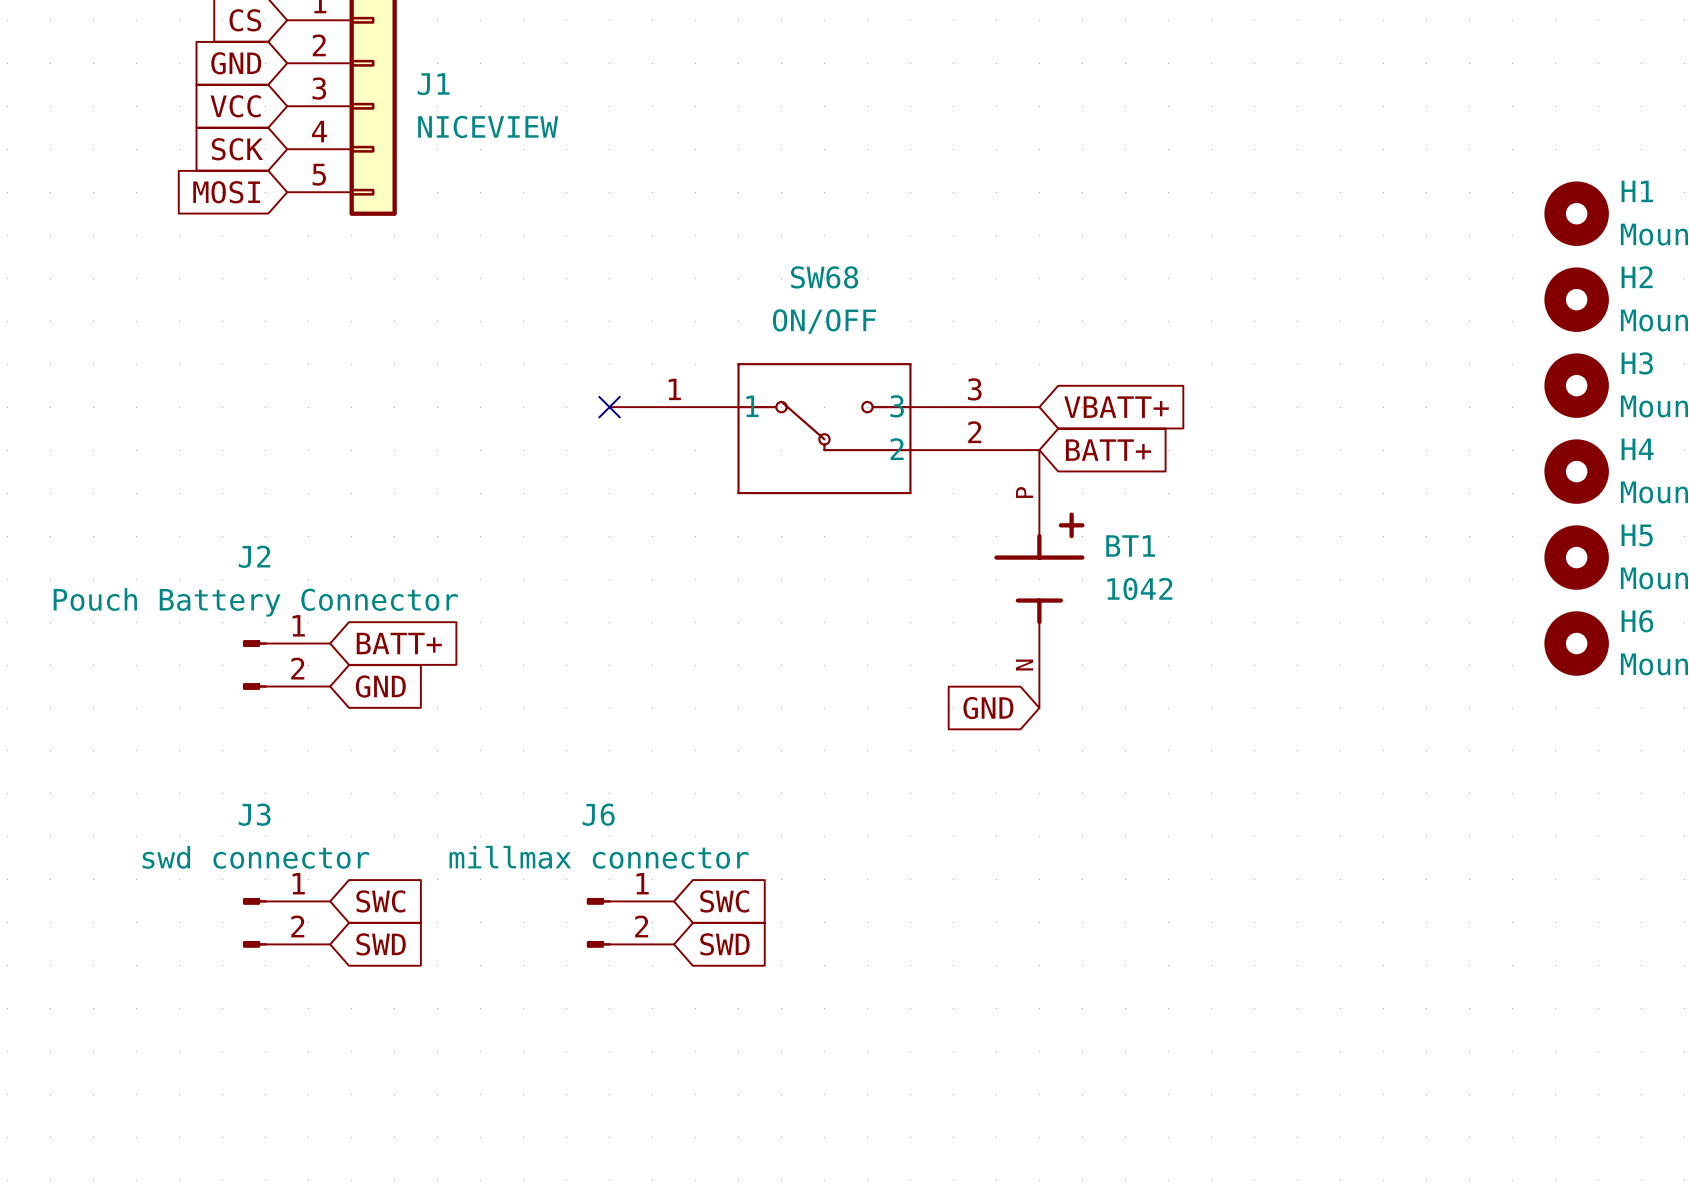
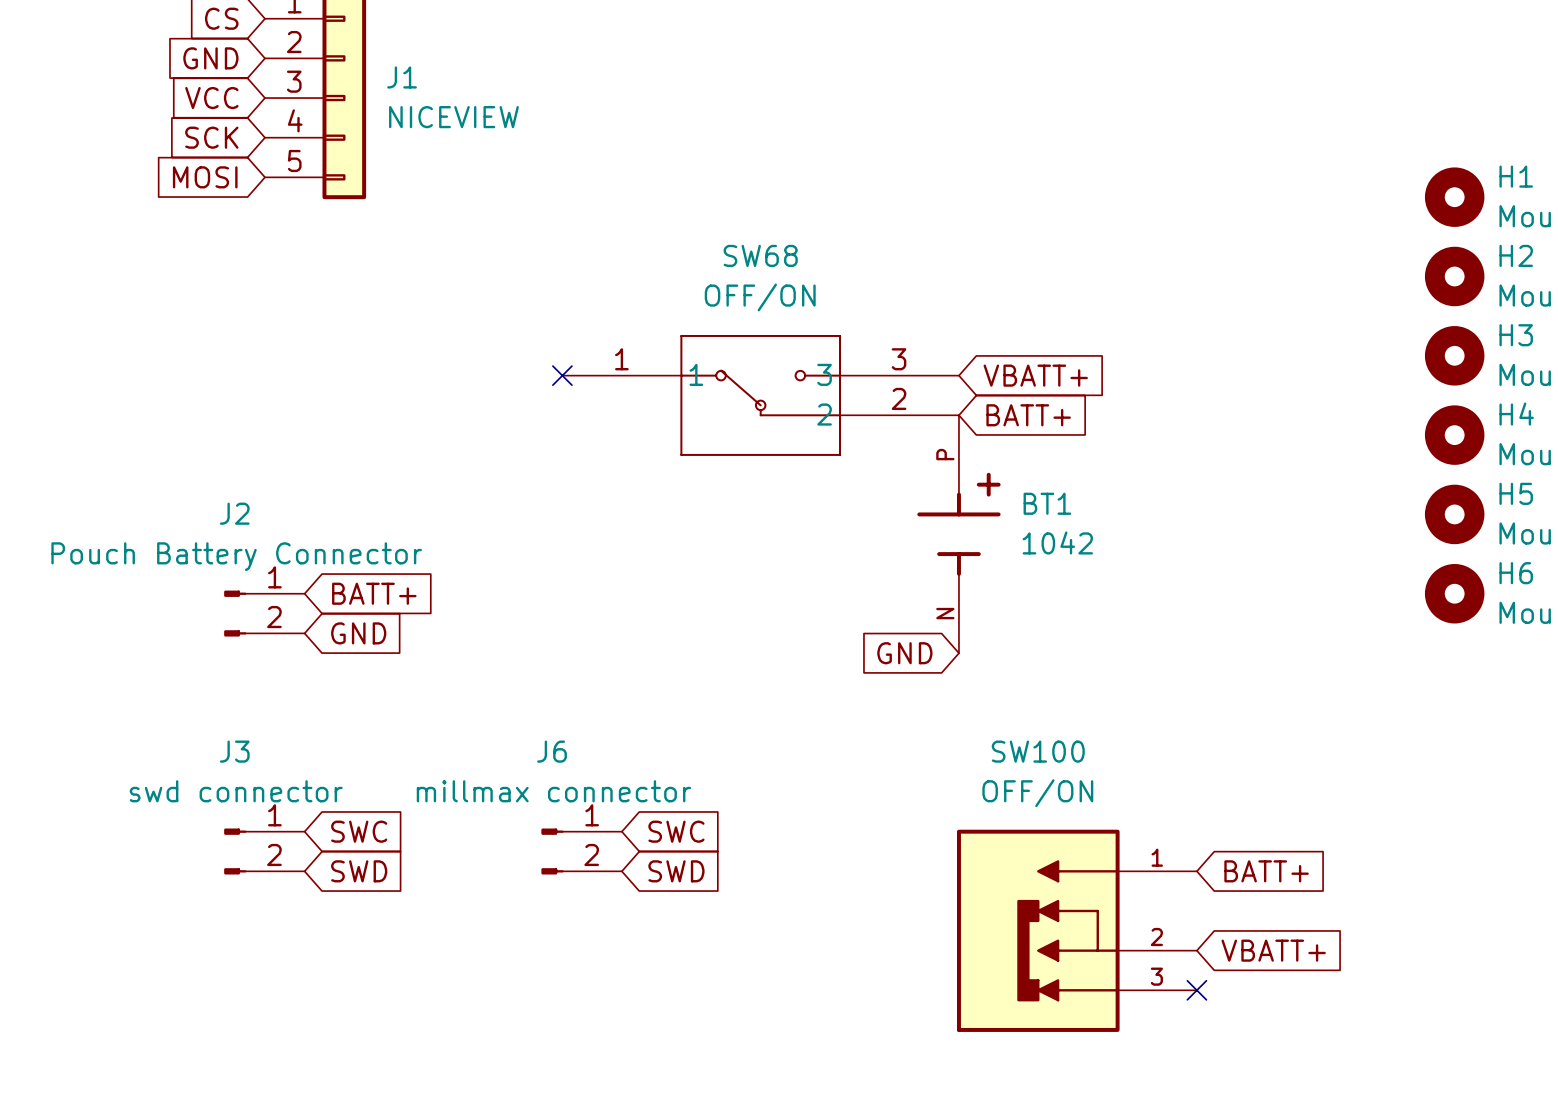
SW68 value: ON/OFF (824, 321) -> OFF/ON (760, 297)
global label: none -> BATT+ (1266, 871)
SW100: none -> OFF/ON (1076, 930)
global label: none -> VBATT+ (1273, 950)
no-connect mark: none -> (1196, 990)

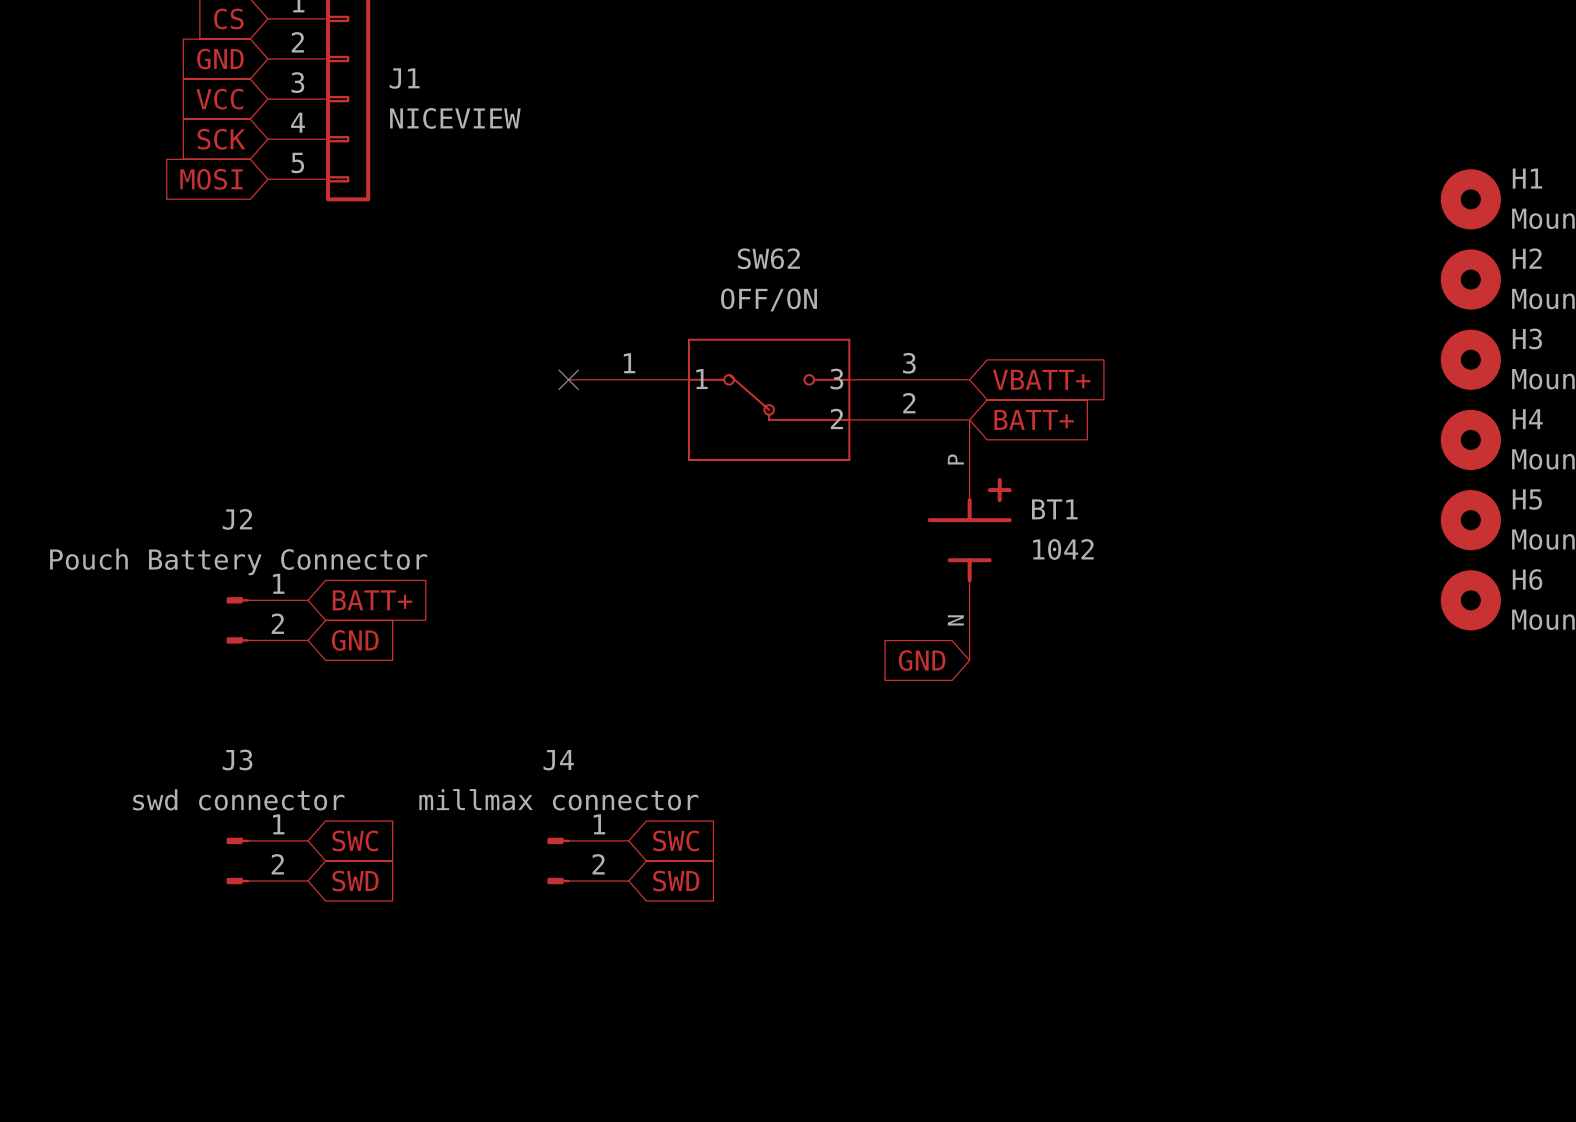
SW68 name: SW68 (760, 255) -> SW62 (768, 258)
J6 name: J6 (552, 751) -> J4 (558, 760)
global label: BATT+ (1266, 871) -> none
SW100: OFF/ON (1076, 930) -> none
global label: VBATT+ (1273, 950) -> none
no-connect mark: (1196, 990) -> none

